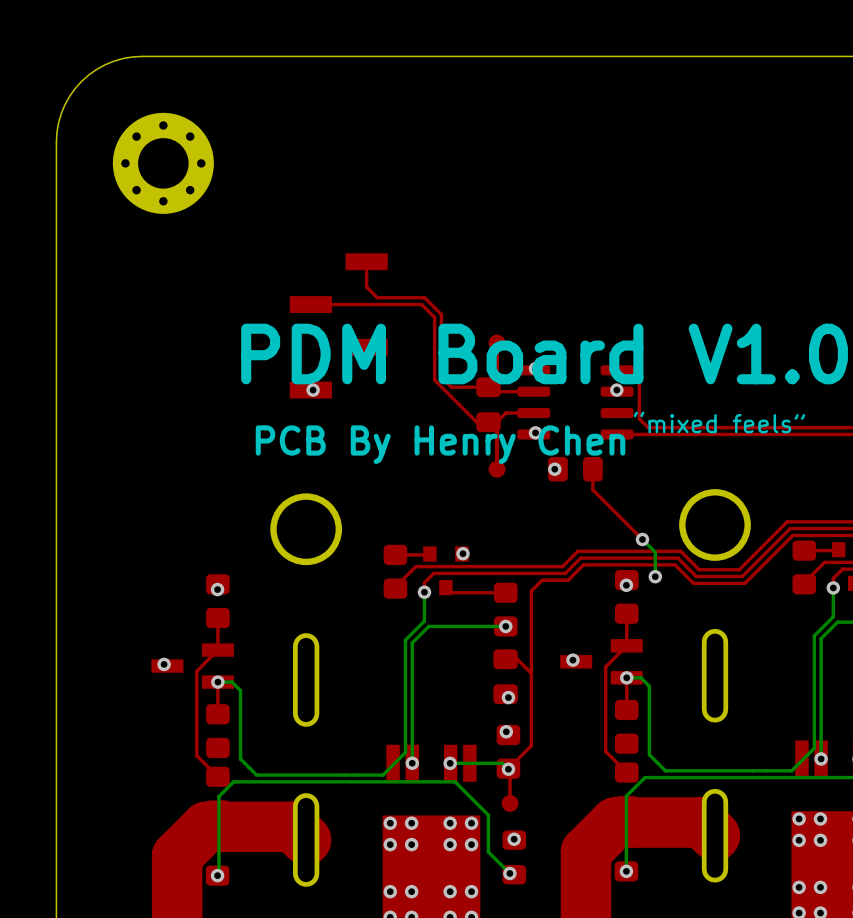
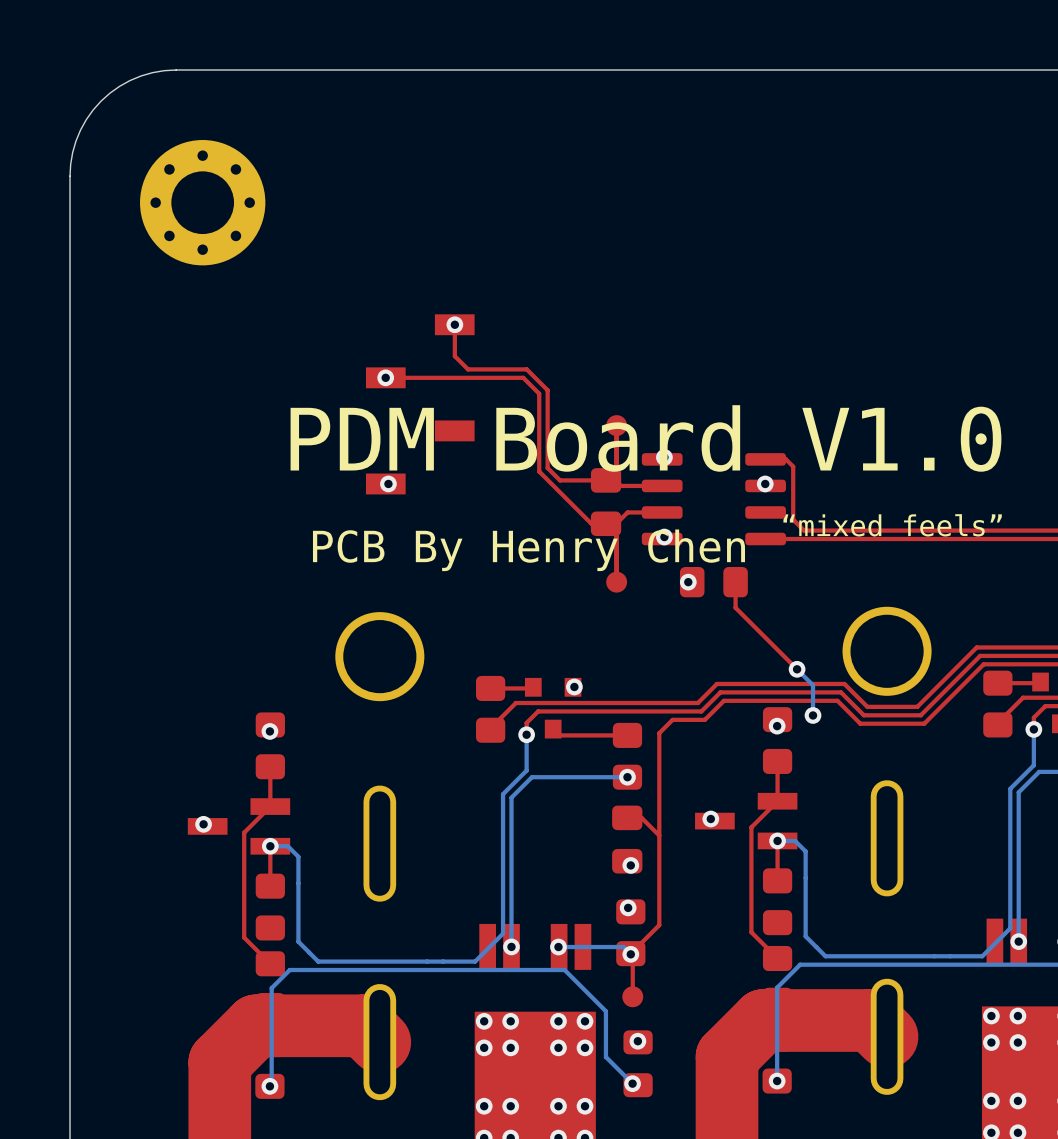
part footprint: [289, 253, 388, 399] -> [365, 314, 475, 495]
via: none -> (454, 324)
via: none -> (385, 377)

